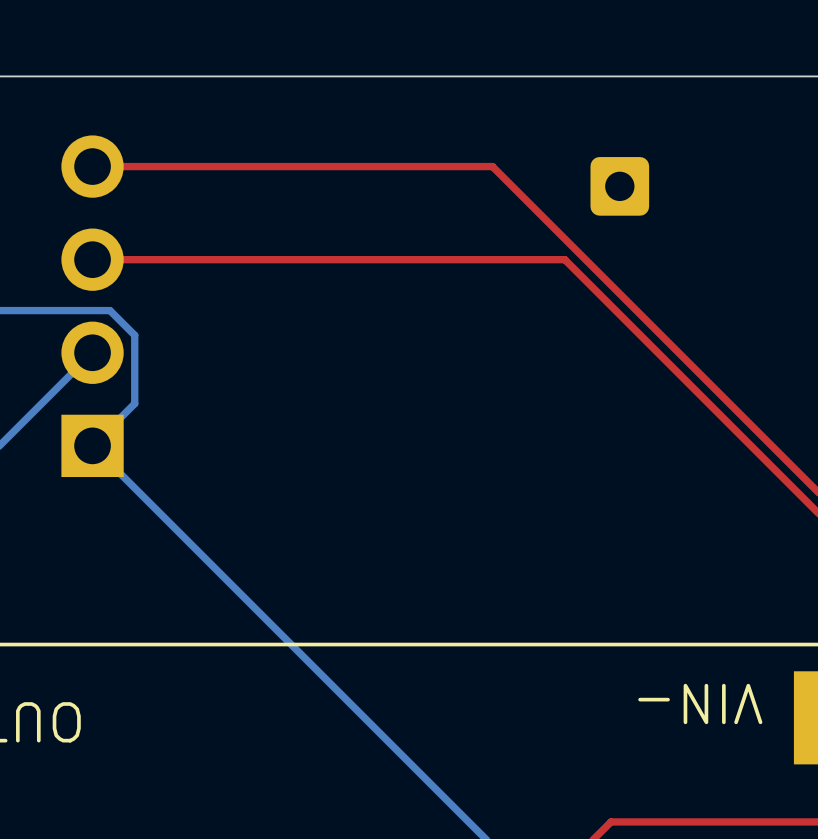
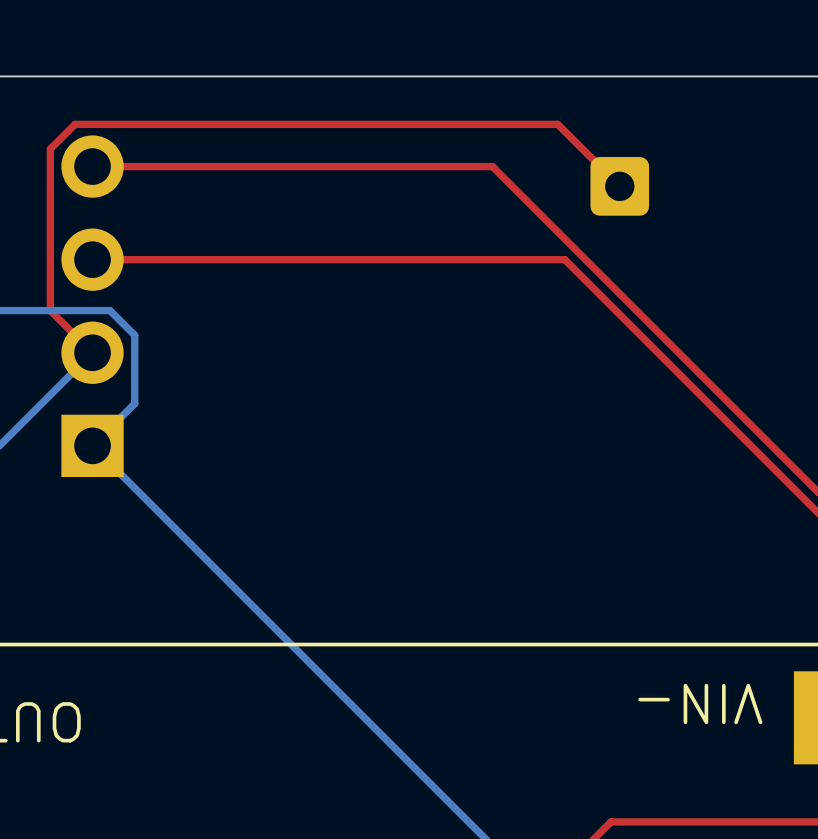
top track: none -> (619, 186) (557, 124) (75, 124) (50, 149) (50, 310) (92, 352)

